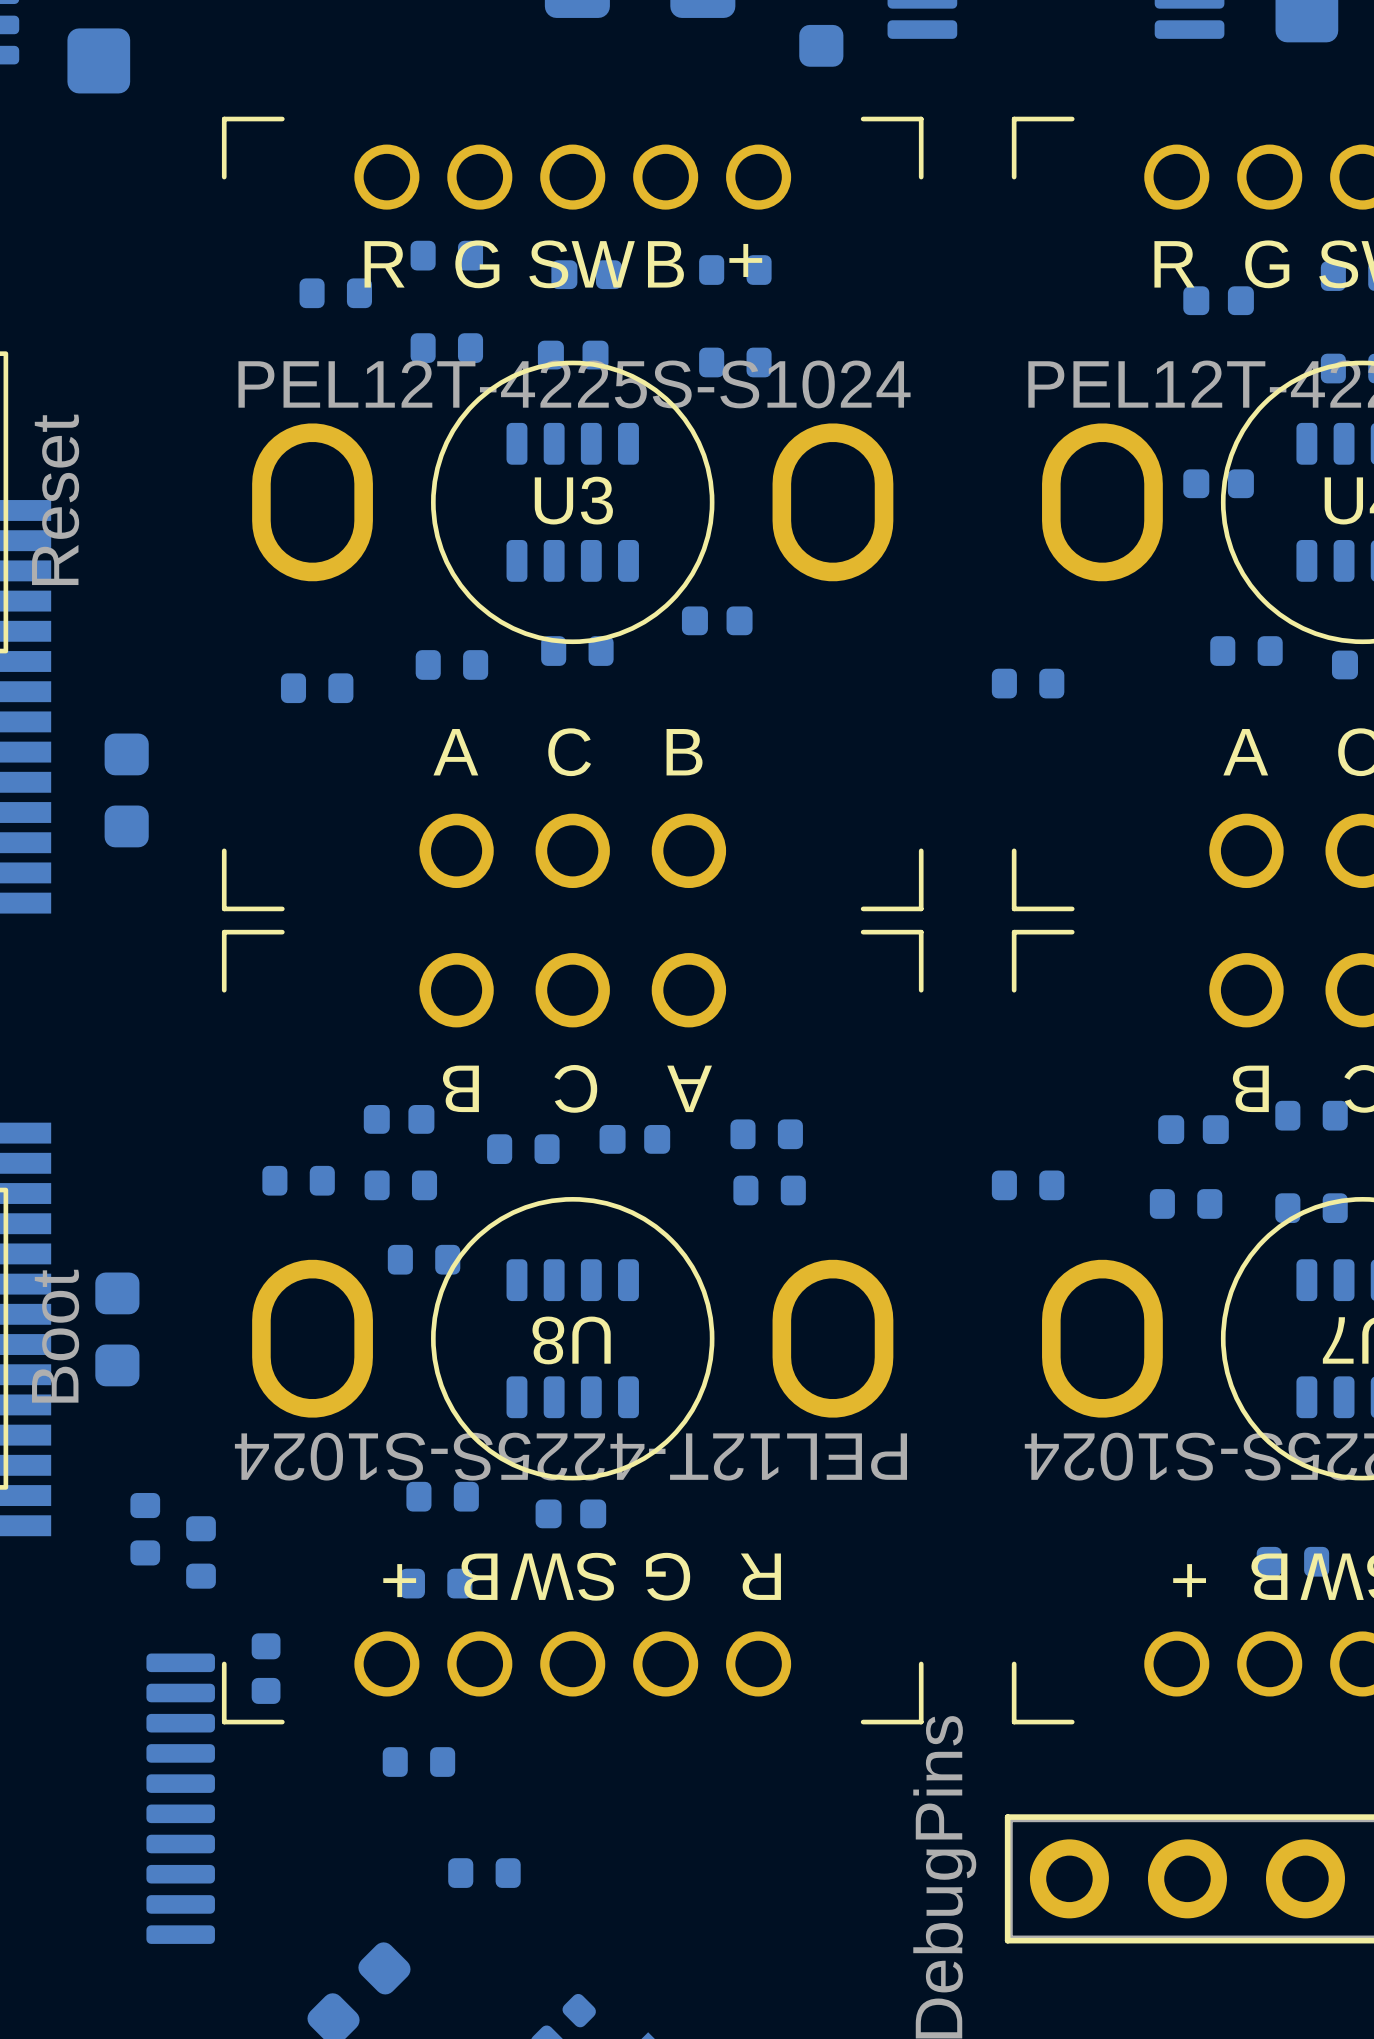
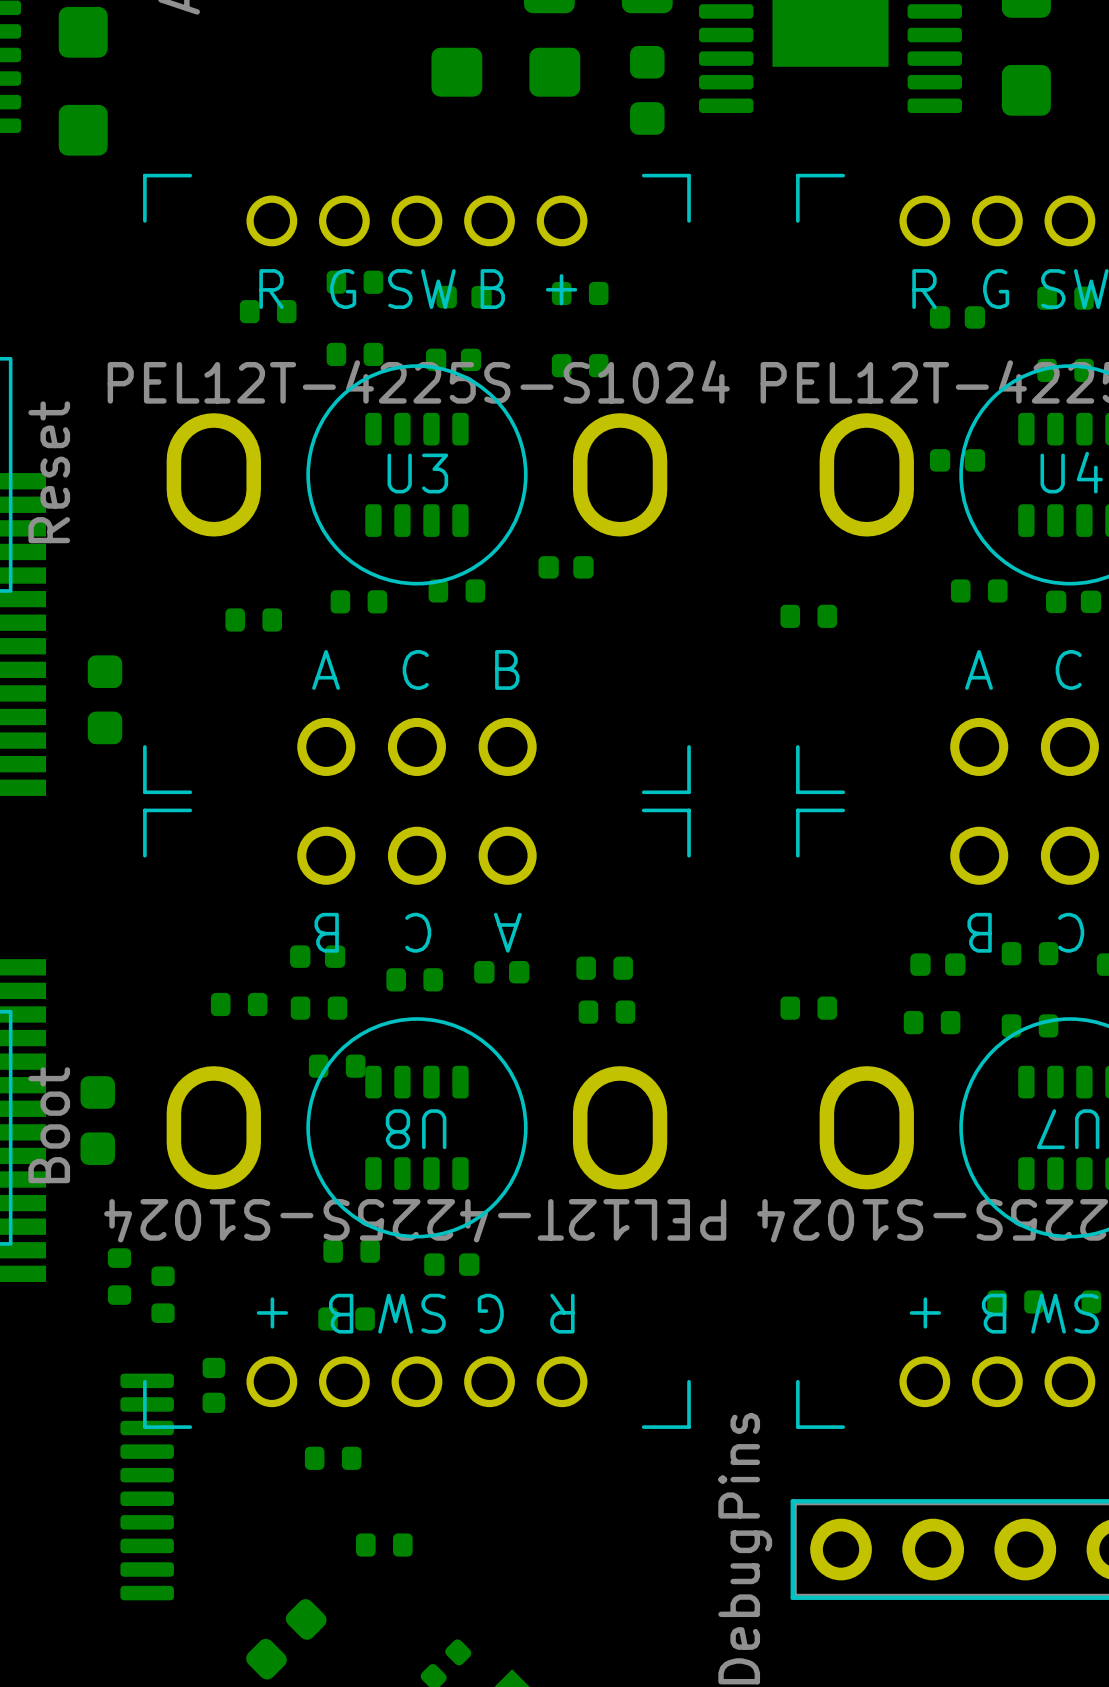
part position: (572, 502) -> (416, 474)
U3 position: (572, 513) -> (416, 483)
U8 position: (572, 1327) -> (416, 1118)
part position: (572, 1338) -> (416, 1127)

